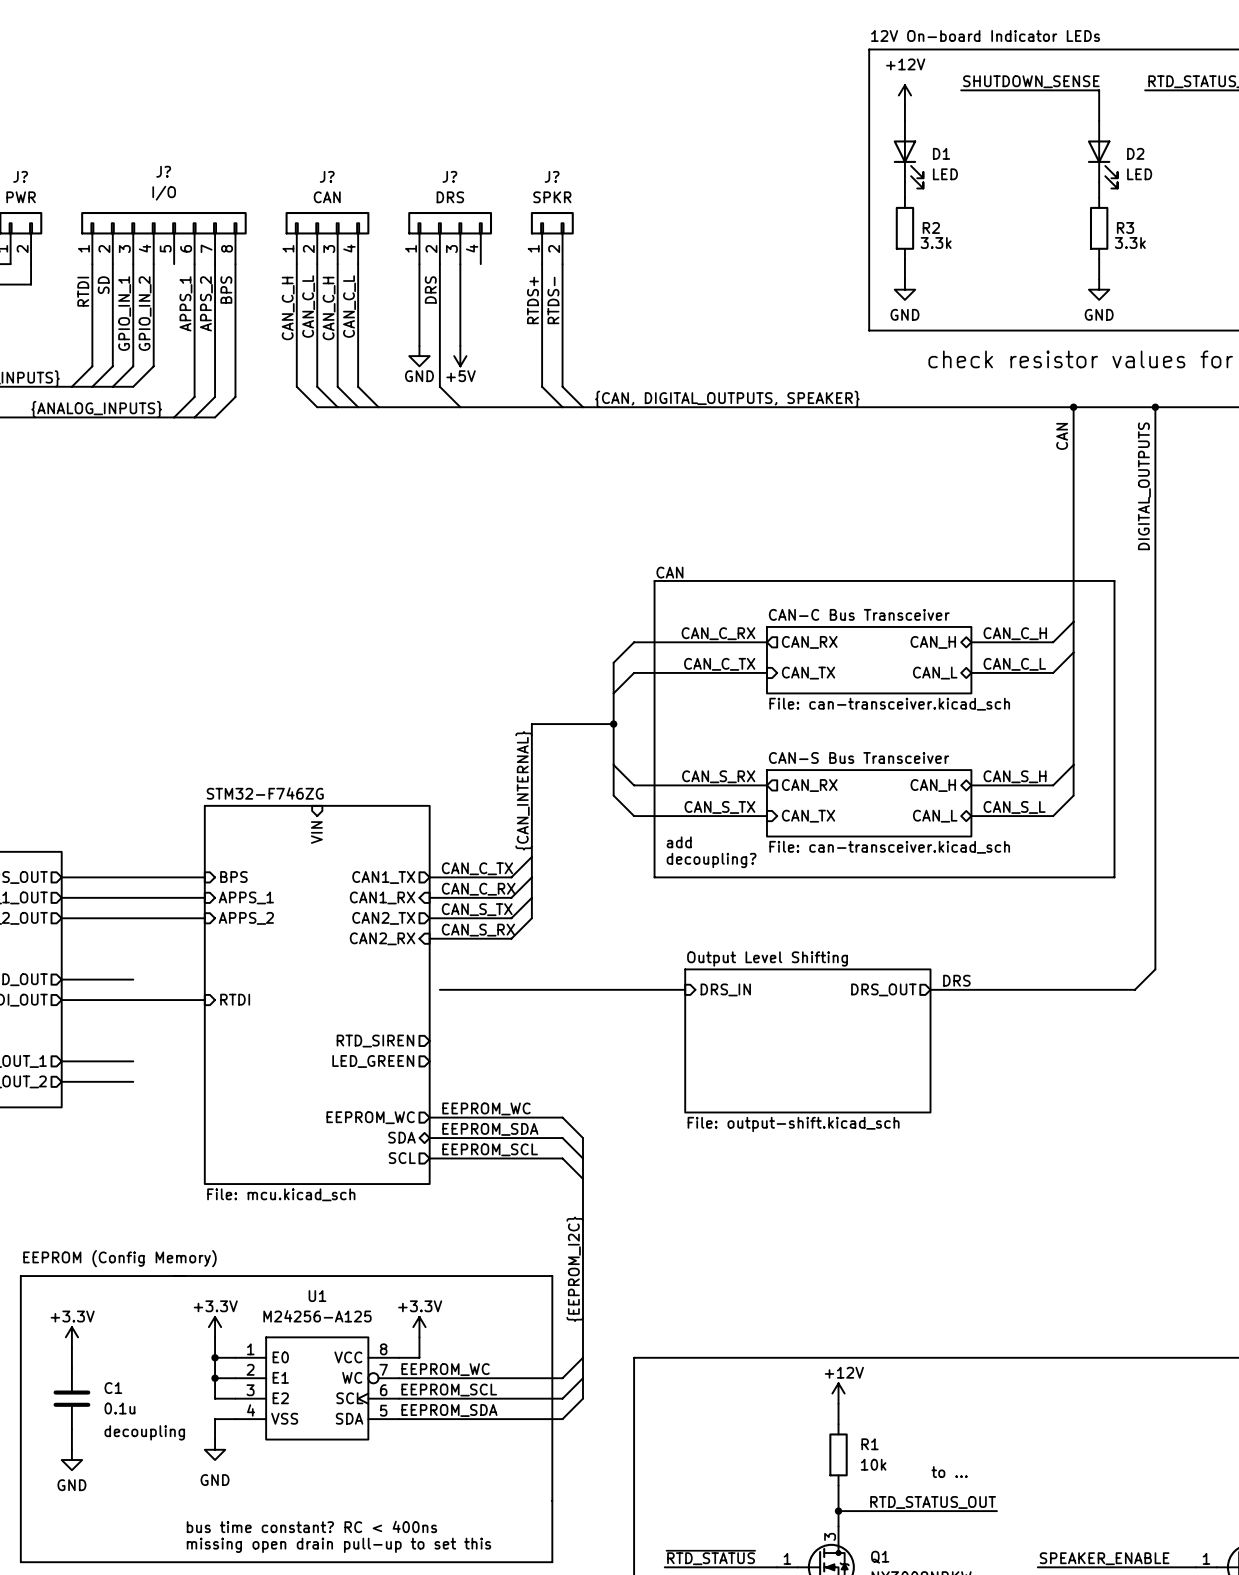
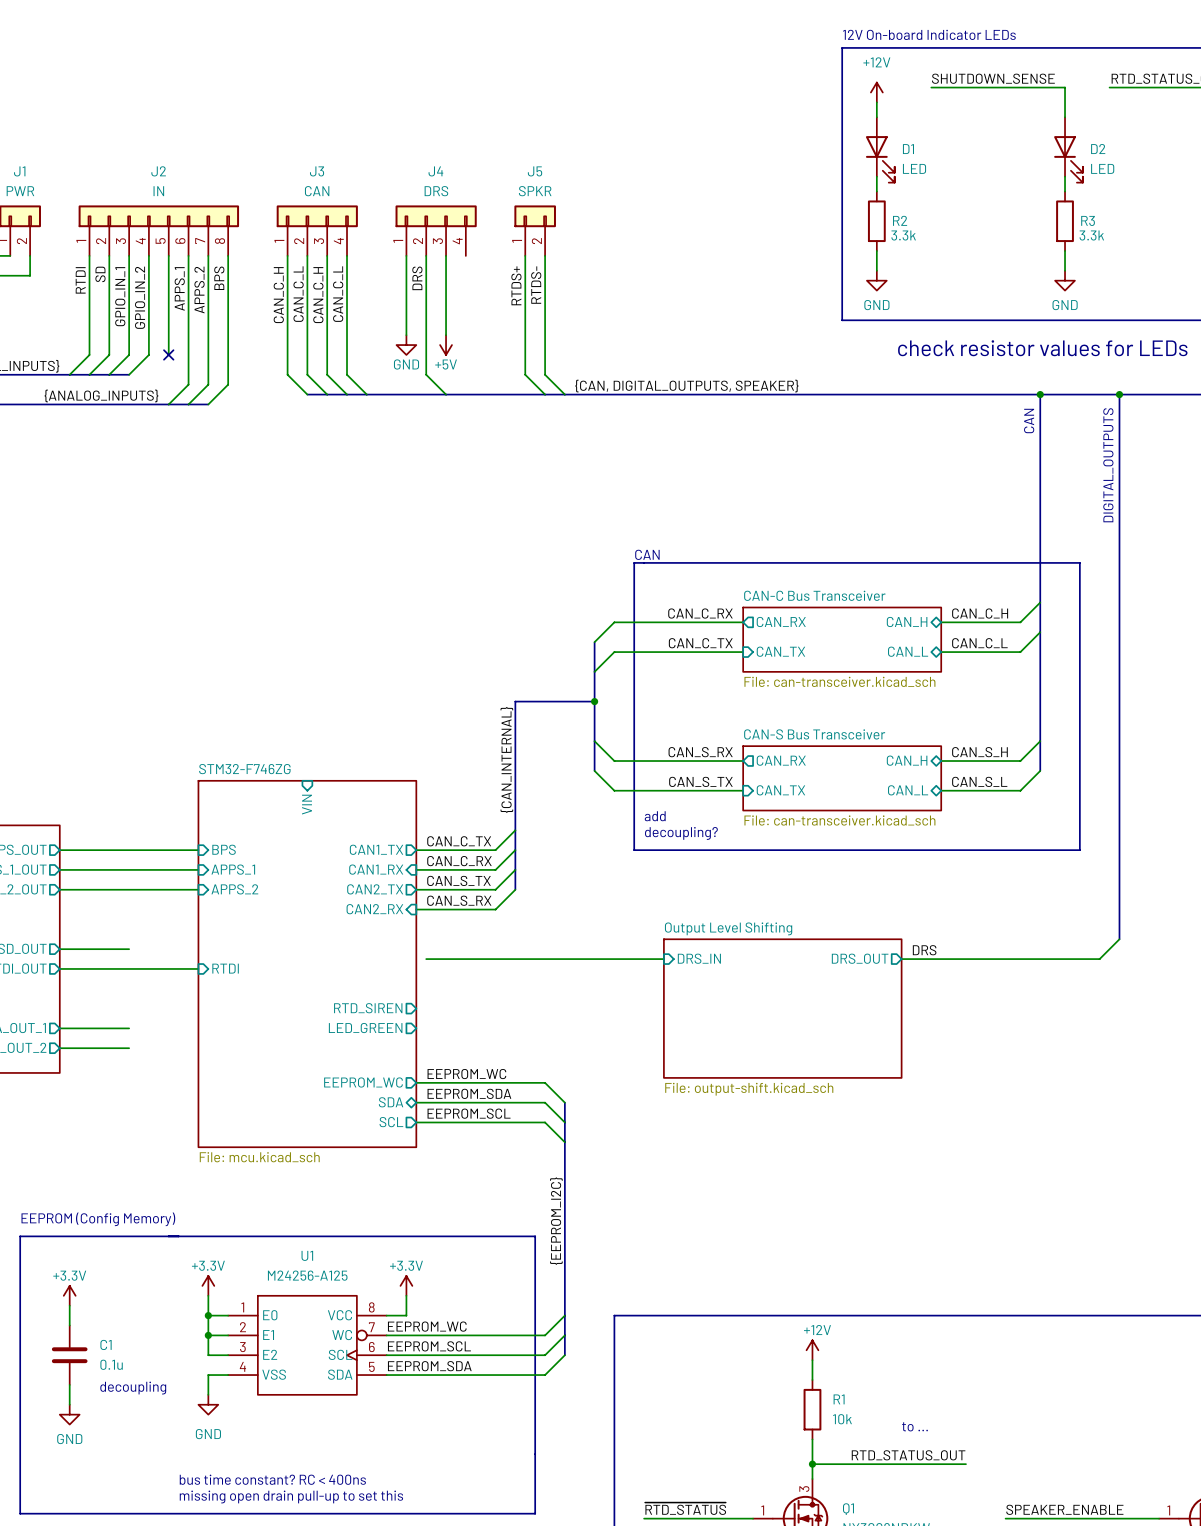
J? name: J? (163, 171) -> J2 (158, 171)
J? name: J? (20, 176) -> J1 (19, 171)
J? name: J? (327, 176) -> J3 (317, 171)
J? name: J? (449, 176) -> J4 (435, 171)
J? name: J? (552, 176) -> J5 (535, 171)
J? value: I/O (164, 193) -> IN (158, 191)
wire: none -> (168, 255) (168, 354)
no-connect mark: none -> (168, 354)

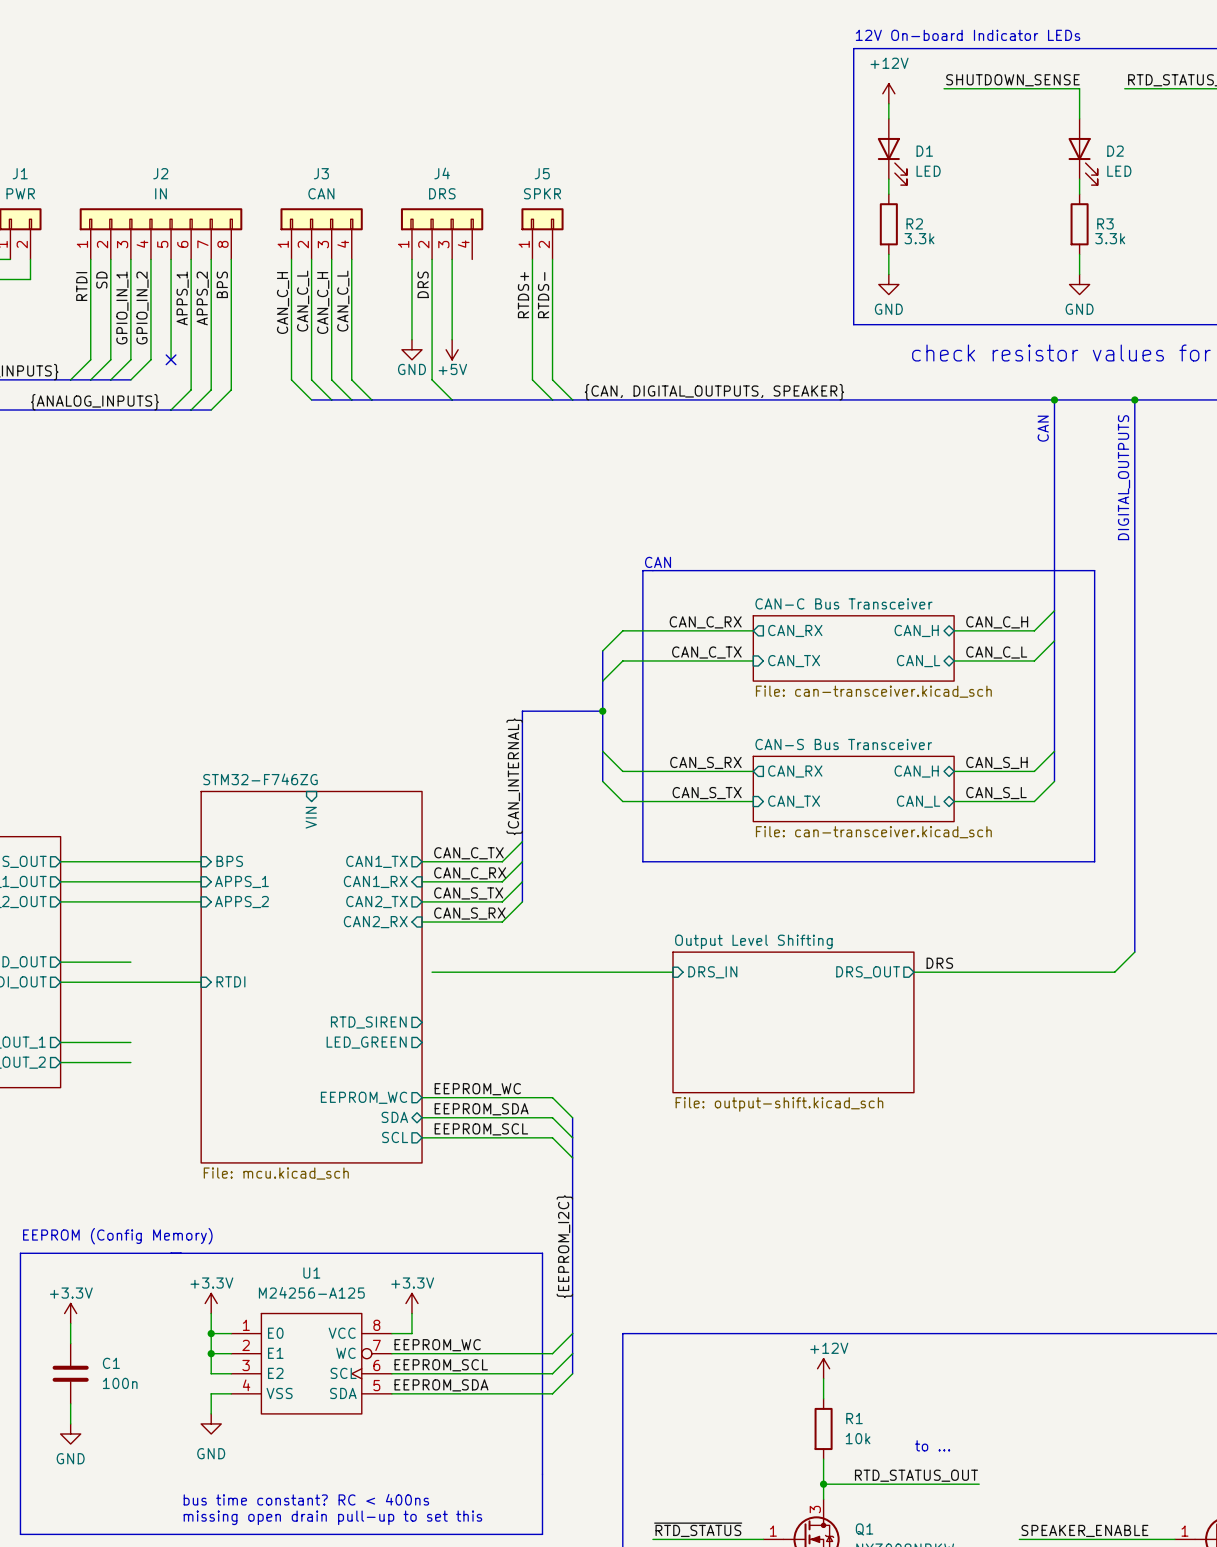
text: add (655, 816) -> none
text: decoupling? (681, 833) -> none
C1 value: 0.1u (111, 1364) -> 100n (120, 1383)
text: decoupling (133, 1388) -> none

